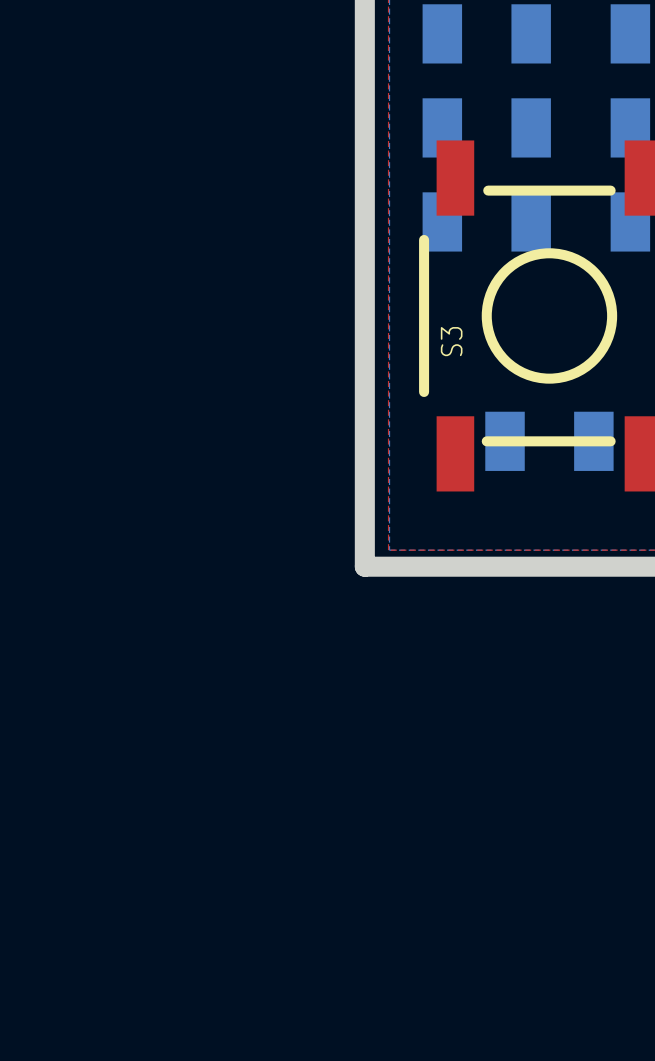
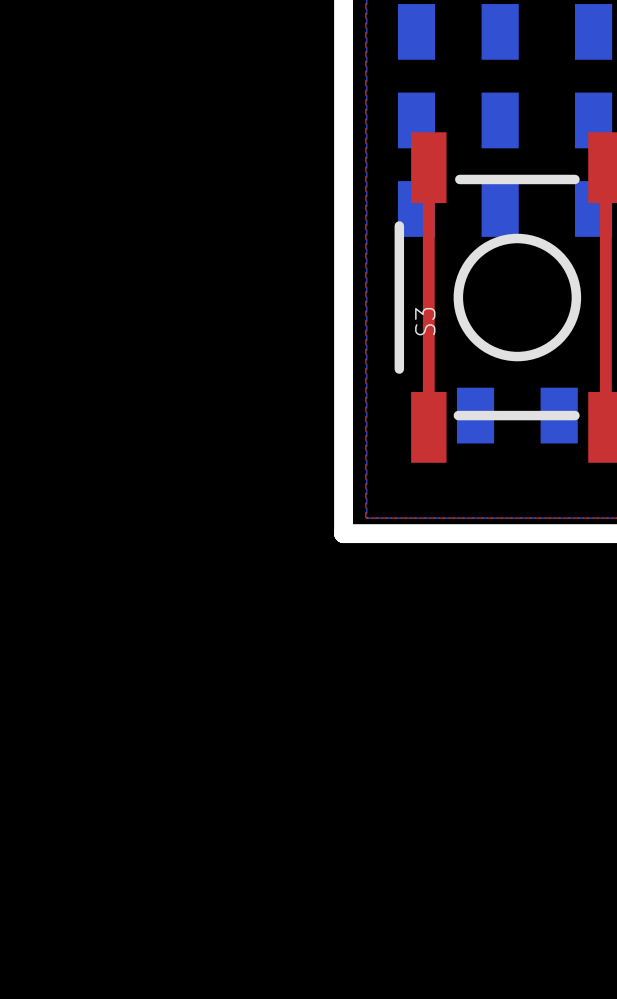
top track: none -> (428, 167) (428, 427)
top track: none -> (605, 167) (605, 427)

